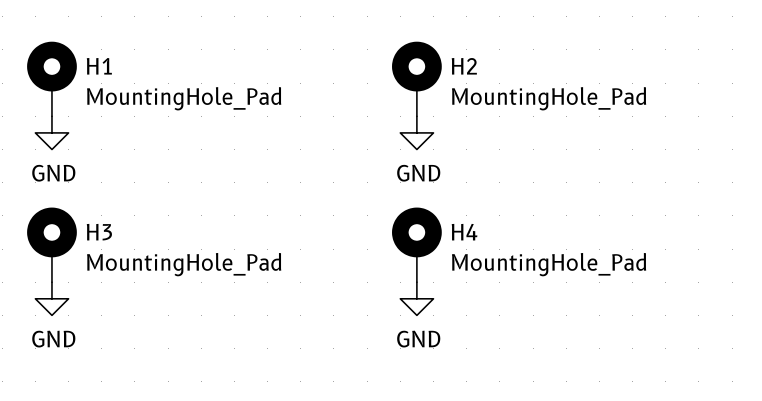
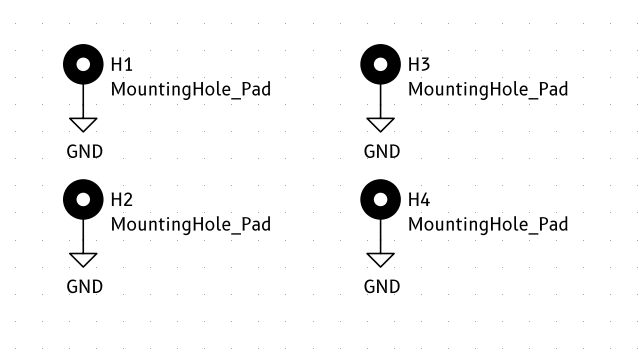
H2 name: H2 (464, 66) -> H3 (419, 64)
H3 name: H3 (99, 232) -> H2 (121, 199)

